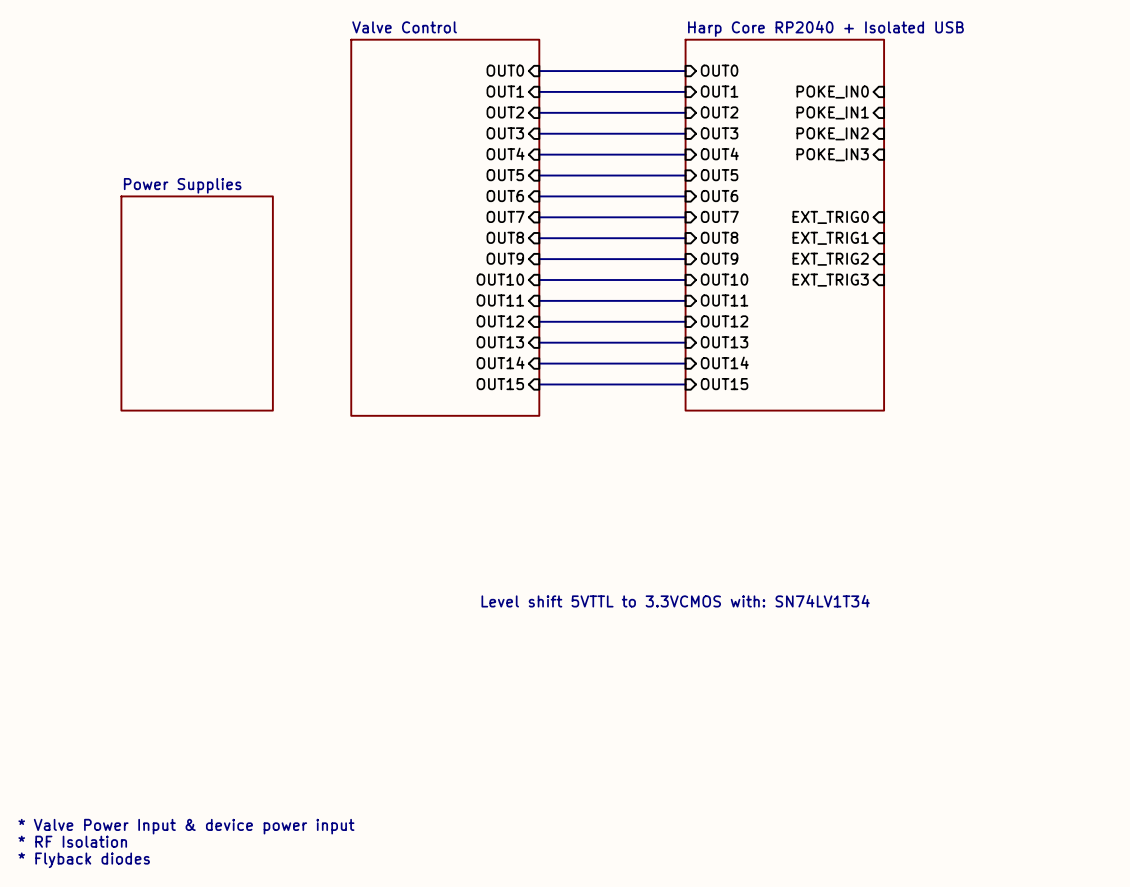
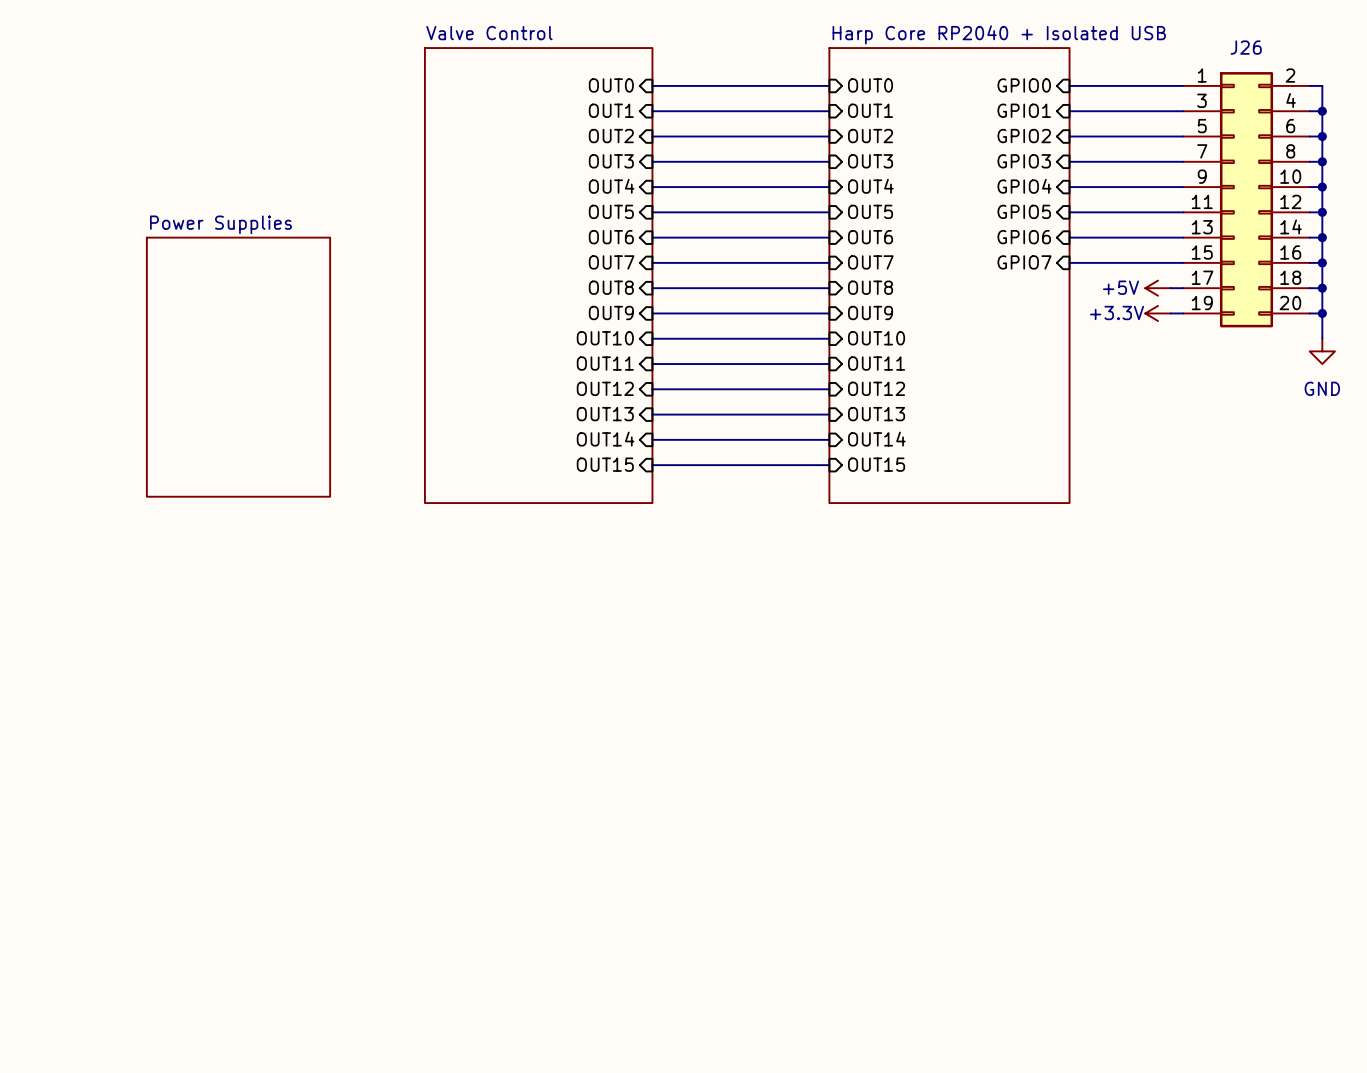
sheet Harp Core RP2040 + Isolated USB shape: [684, 39, 885, 412] -> [828, 47, 1071, 504]
sheet pin: none -> GPIO0 (1024, 85)
wire: none -> (1069, 85) (1183, 85)
wire: none -> (1309, 85) (1322, 85) (1322, 338)
wire: none -> (1069, 111) (1183, 111)
wire: none -> (1309, 111) (1322, 111)
junction: none -> (1322, 111)
sheet pin: POKE_IN0 (832, 92) -> GPIO1 (1024, 110)
sheet pin: POKE_IN1 (832, 112) -> GPIO2 (1024, 136)
wire: none -> (1069, 136) (1183, 136)
wire: none -> (1309, 136) (1322, 136)
junction: none -> (1322, 136)
sheet pin: POKE_IN2 (832, 133) -> GPIO3 (1024, 161)
wire: none -> (1069, 161) (1183, 161)
wire: none -> (1309, 161) (1322, 161)
junction: none -> (1322, 161)
sheet pin: POKE_IN3 (832, 154) -> GPIO4 (1024, 186)
wire: none -> (1069, 187) (1183, 187)
wire: none -> (1309, 187) (1322, 187)
junction: none -> (1322, 187)
J26: none -> (1246, 199)
sheet pin: none -> GPIO5 (1024, 211)
wire: none -> (1069, 212) (1183, 212)
wire: none -> (1309, 212) (1322, 212)
junction: none -> (1322, 212)
sheet pin: none -> GPIO6 (1024, 237)
wire: none -> (1069, 237) (1183, 237)
wire: none -> (1309, 237) (1322, 237)
junction: none -> (1322, 237)
sheet pin: EXT_TRIG0 (830, 217) -> GPIO7 (1024, 262)
wire: none -> (1069, 262) (1183, 262)
wire: none -> (1309, 262) (1322, 262)
junction: none -> (1322, 262)
sheet pin: EXT_TRIG1 (830, 238) -> none
power symbol: none -> +5V (1158, 288)
wire: none -> (1170, 288) (1183, 288)
wire: none -> (1309, 288) (1322, 288)
junction: none -> (1322, 288)
sheet pin: EXT_TRIG2 (830, 259) -> none
power symbol: none -> +3.3V (1158, 313)
wire: none -> (1170, 313) (1183, 313)
wire: none -> (1309, 313) (1322, 313)
junction: none -> (1322, 313)
sheet pin: EXT_TRIG3 (830, 280) -> none
power symbol: none -> GND (1322, 351)
text: Level shift 5VTTL to 3.3VCMOS with: SN74LV1T34 (675, 601) -> none
text: * Valve Power Input & device power input (186, 826) -> none
text: * RF Isolation (72, 841) -> none
text: * Flyback diodes (84, 860) -> none

